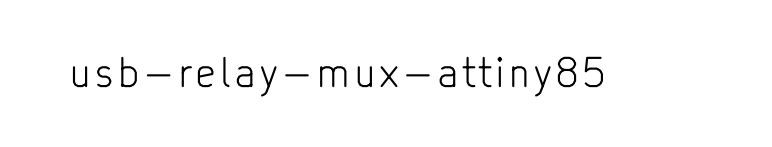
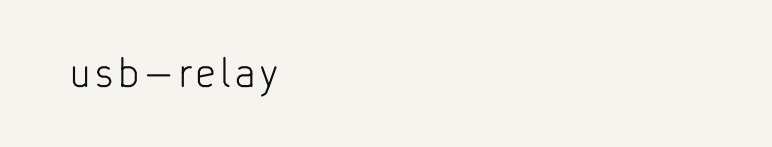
label: usb-relay-mux-attiny85 (337, 76) -> usb-relay (174, 76)

